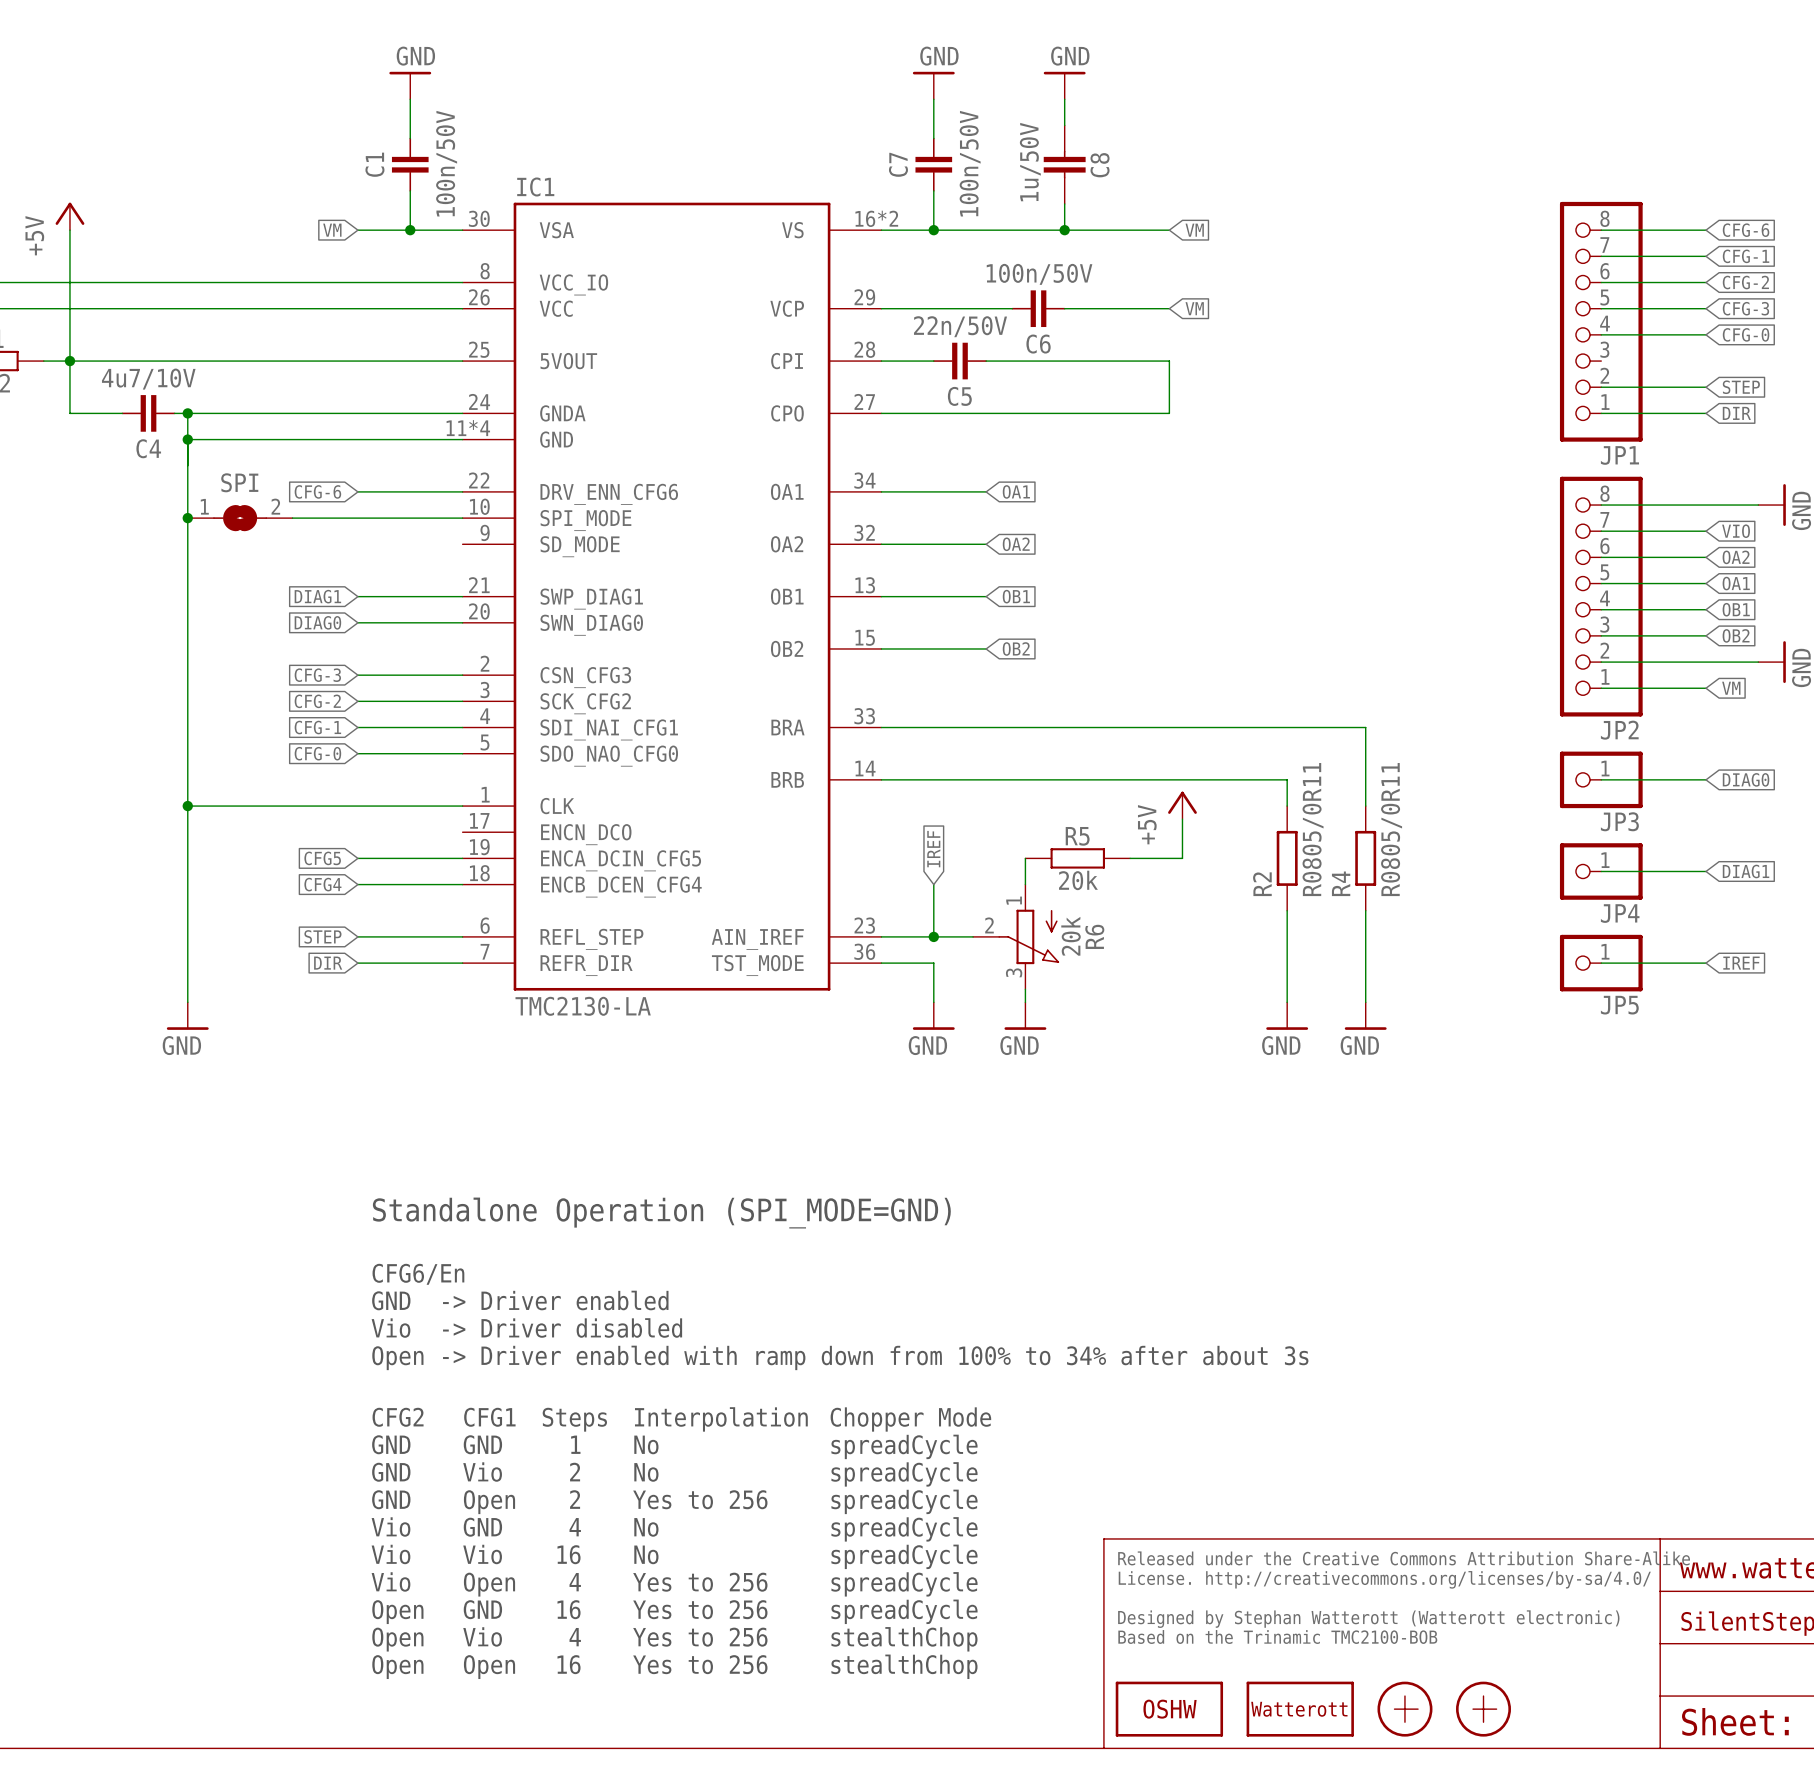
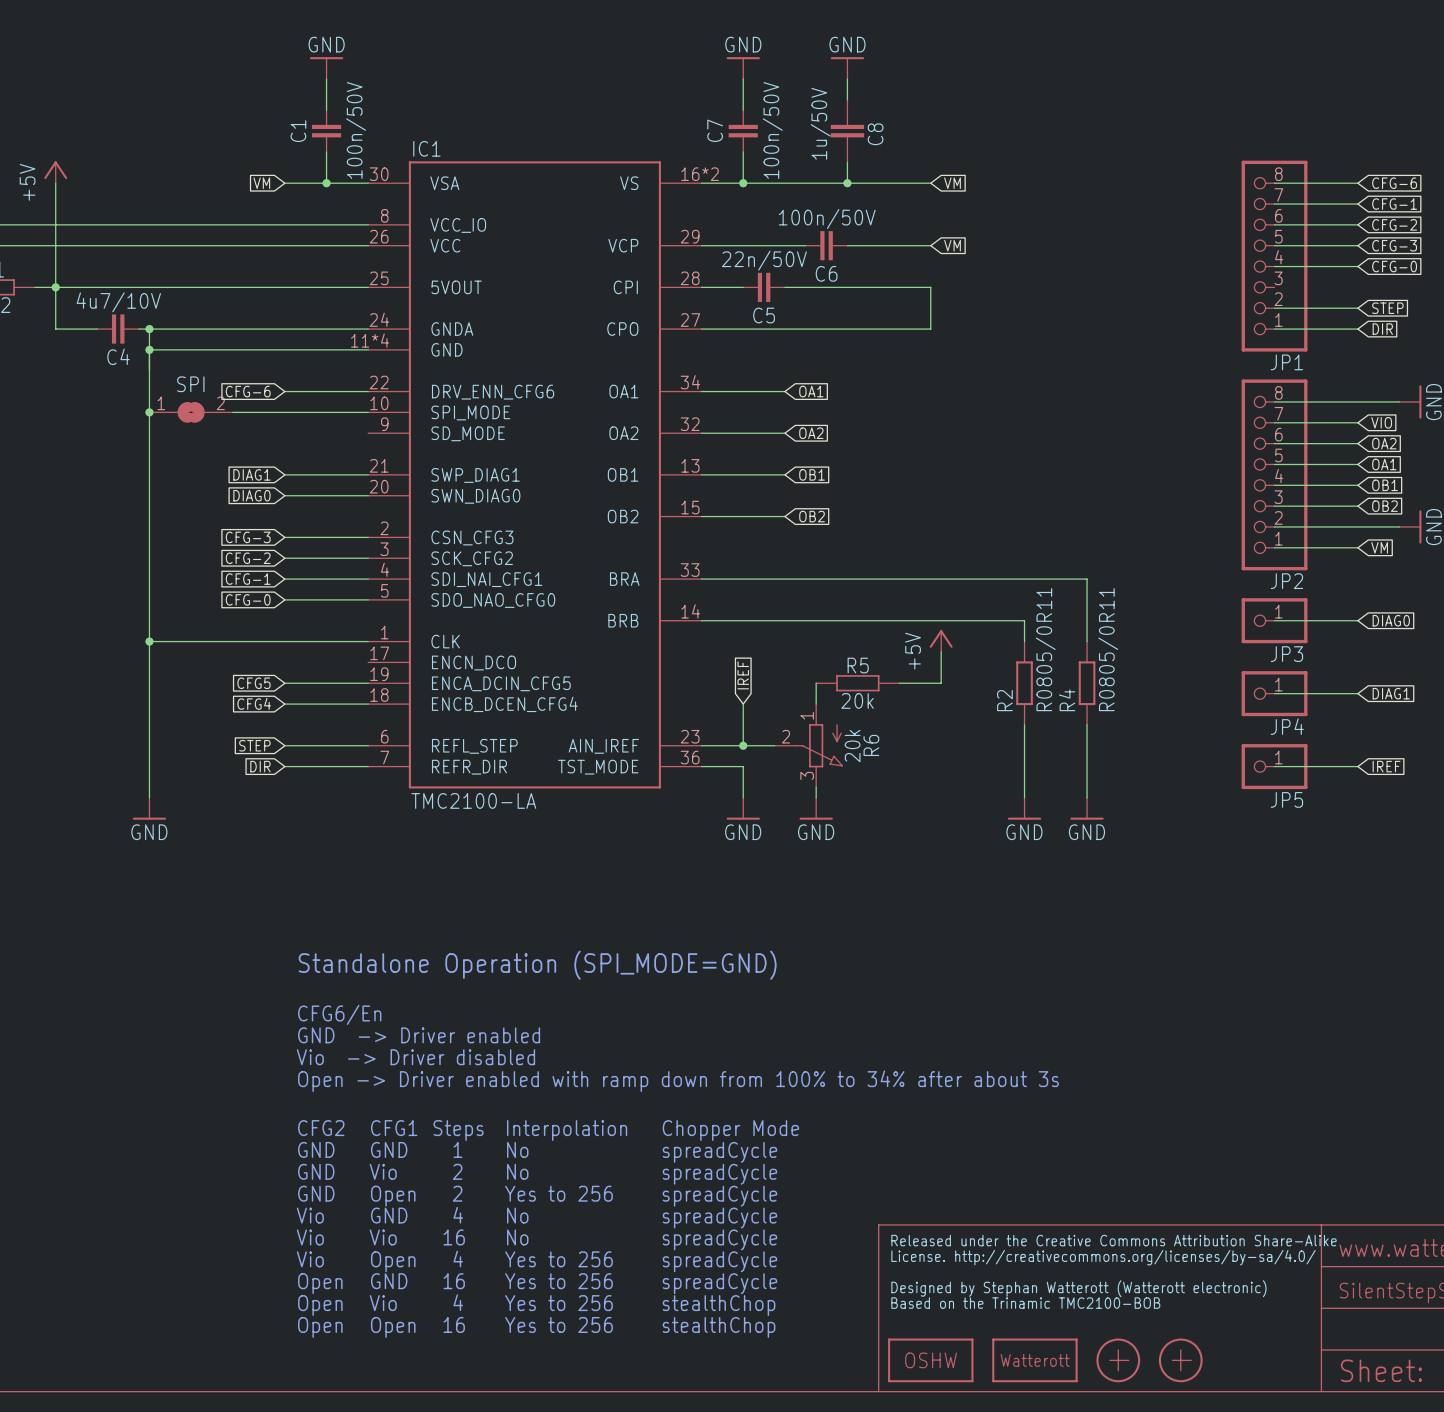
IC1 value: TMC2130-LA (583, 1006) -> TMC2100-LA (473, 800)

